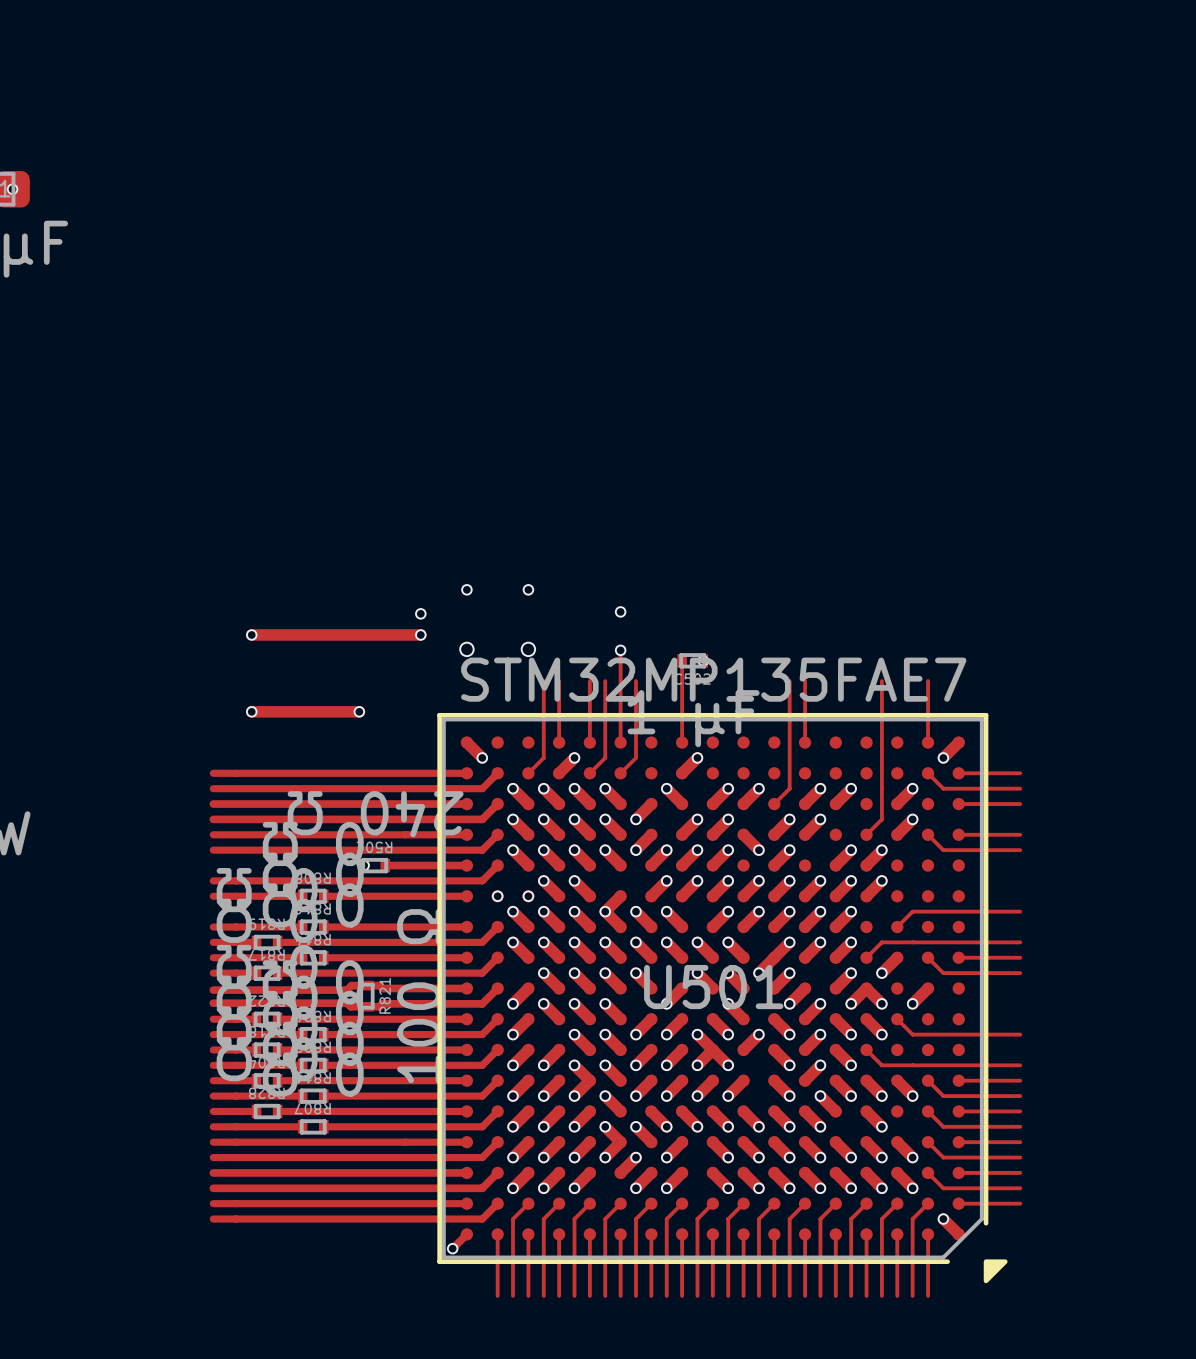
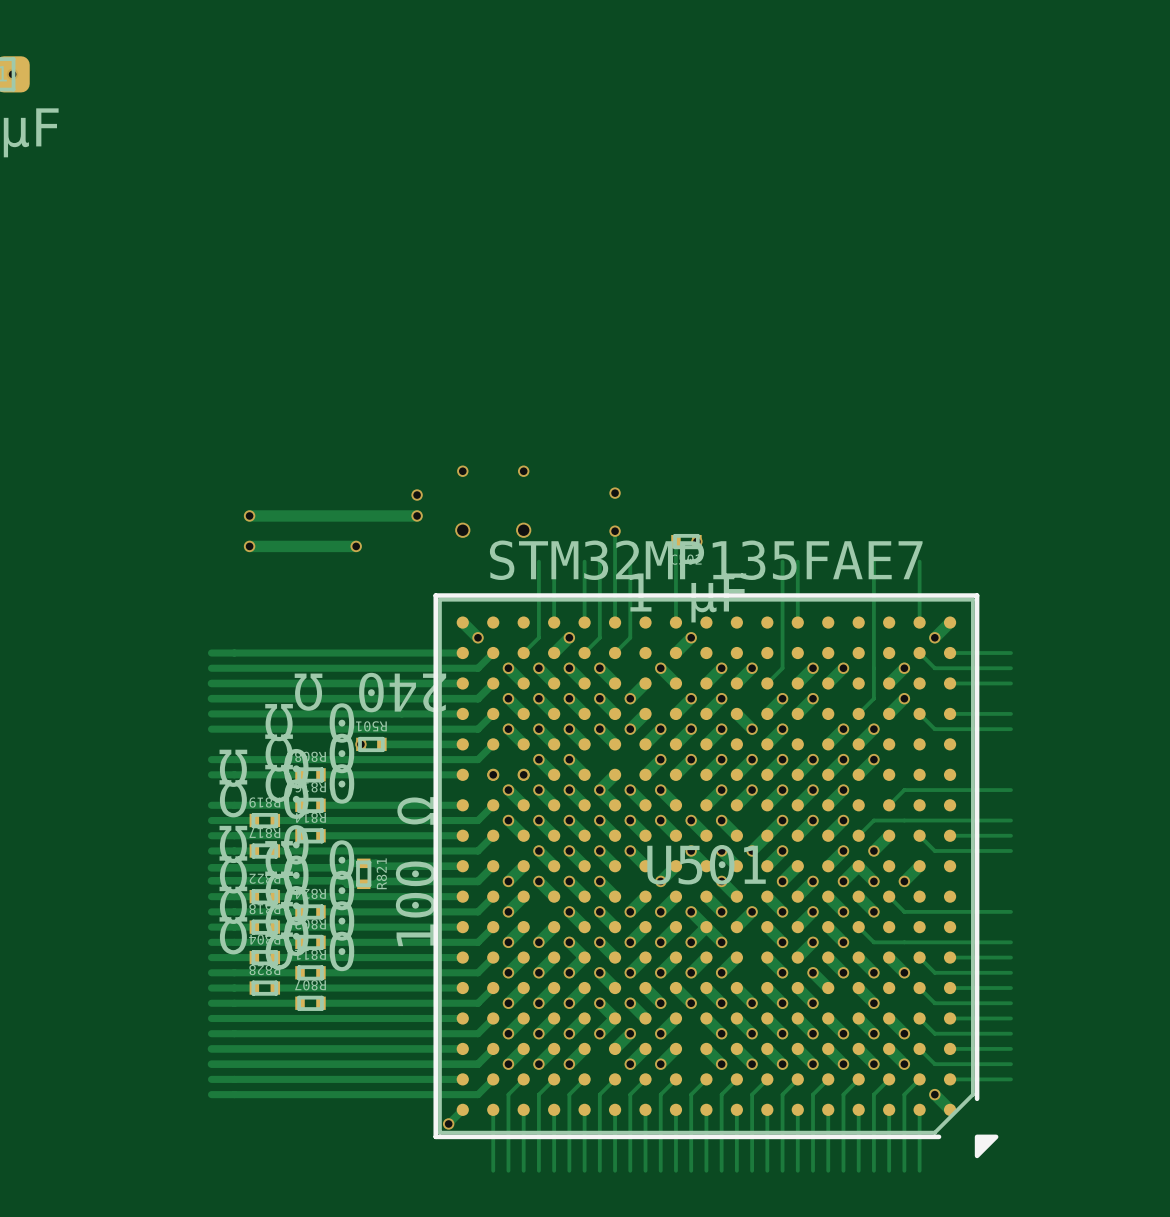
track: (251, 711) (359, 711) -> (249, 546) (356, 546)
via position: (251, 711) -> (249, 546)
via position: (359, 711) -> (356, 546)

